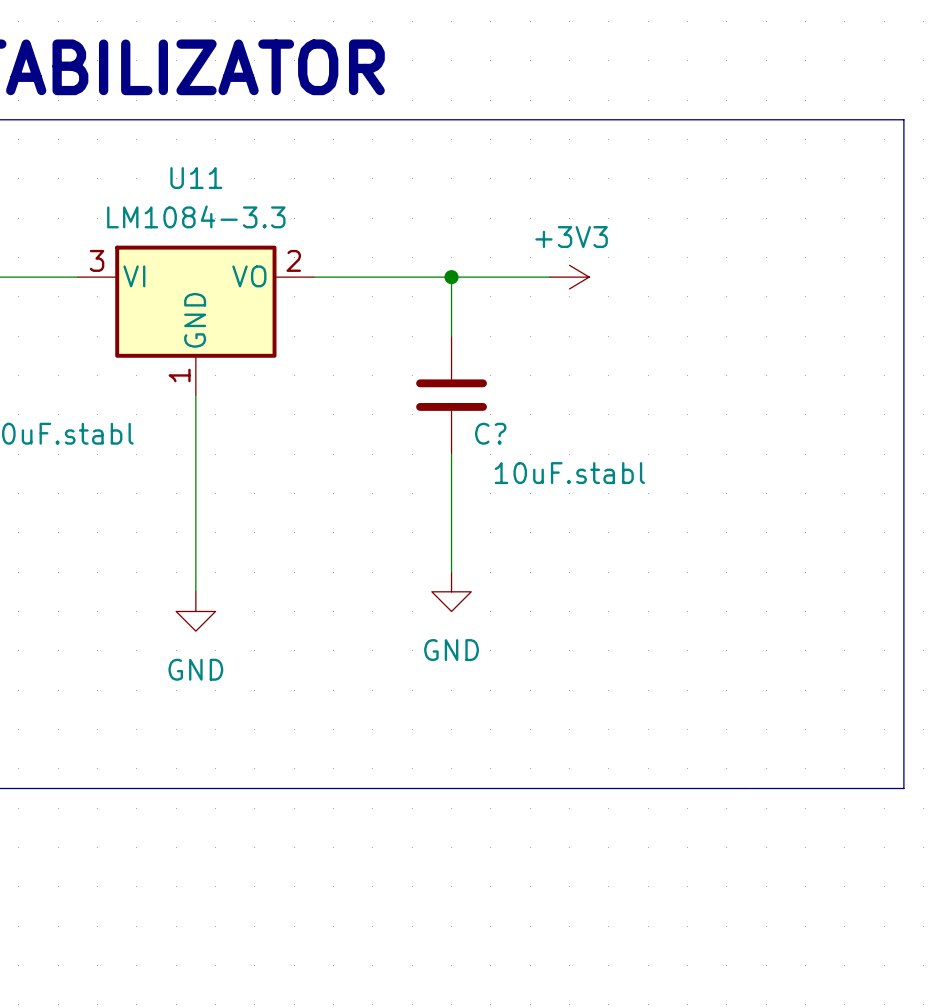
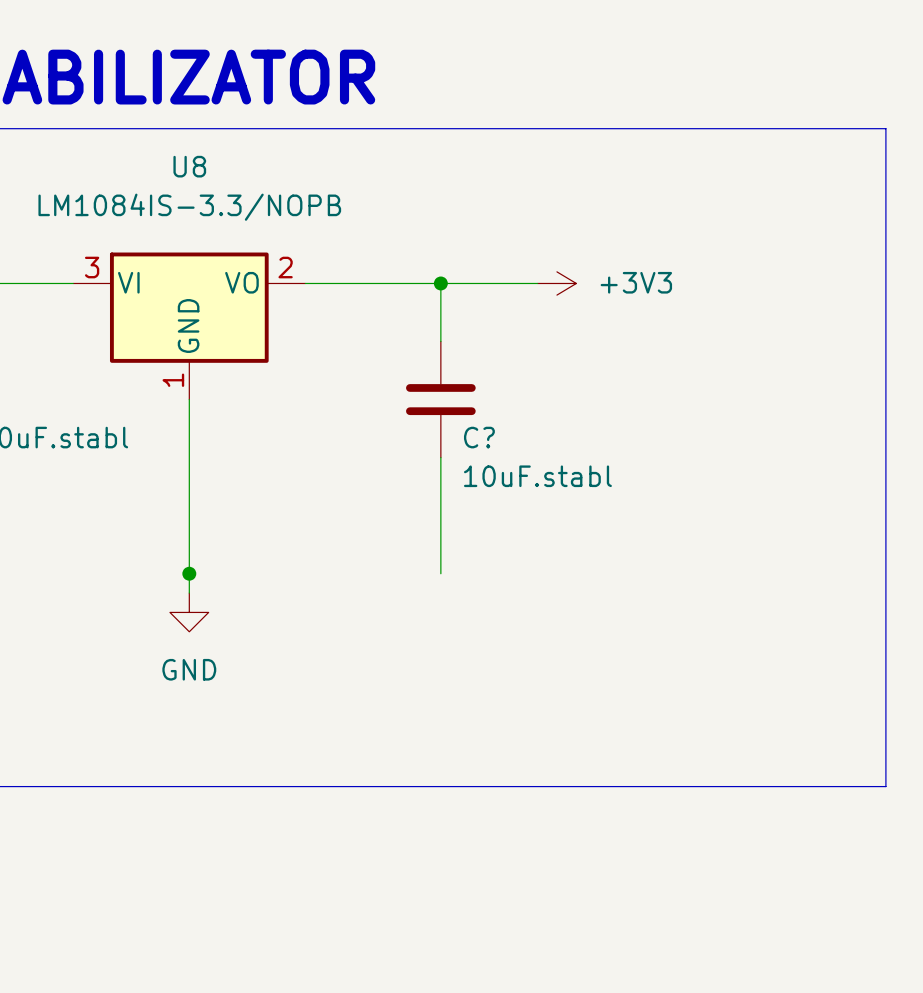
U11 name: U11 (196, 178) -> U8 (189, 166)
U11 value: LM1084-3.3 (196, 216) -> LM1084IS-3.3/NOPB (189, 207)
power symbol text position: +3V3 (571, 237) -> +3V3 (636, 282)
C? value position: 10uF.stabl (569, 473) -> 10uF.stabl (537, 476)
junction: none -> (189, 573)
power symbol: GND (451, 591) -> none

